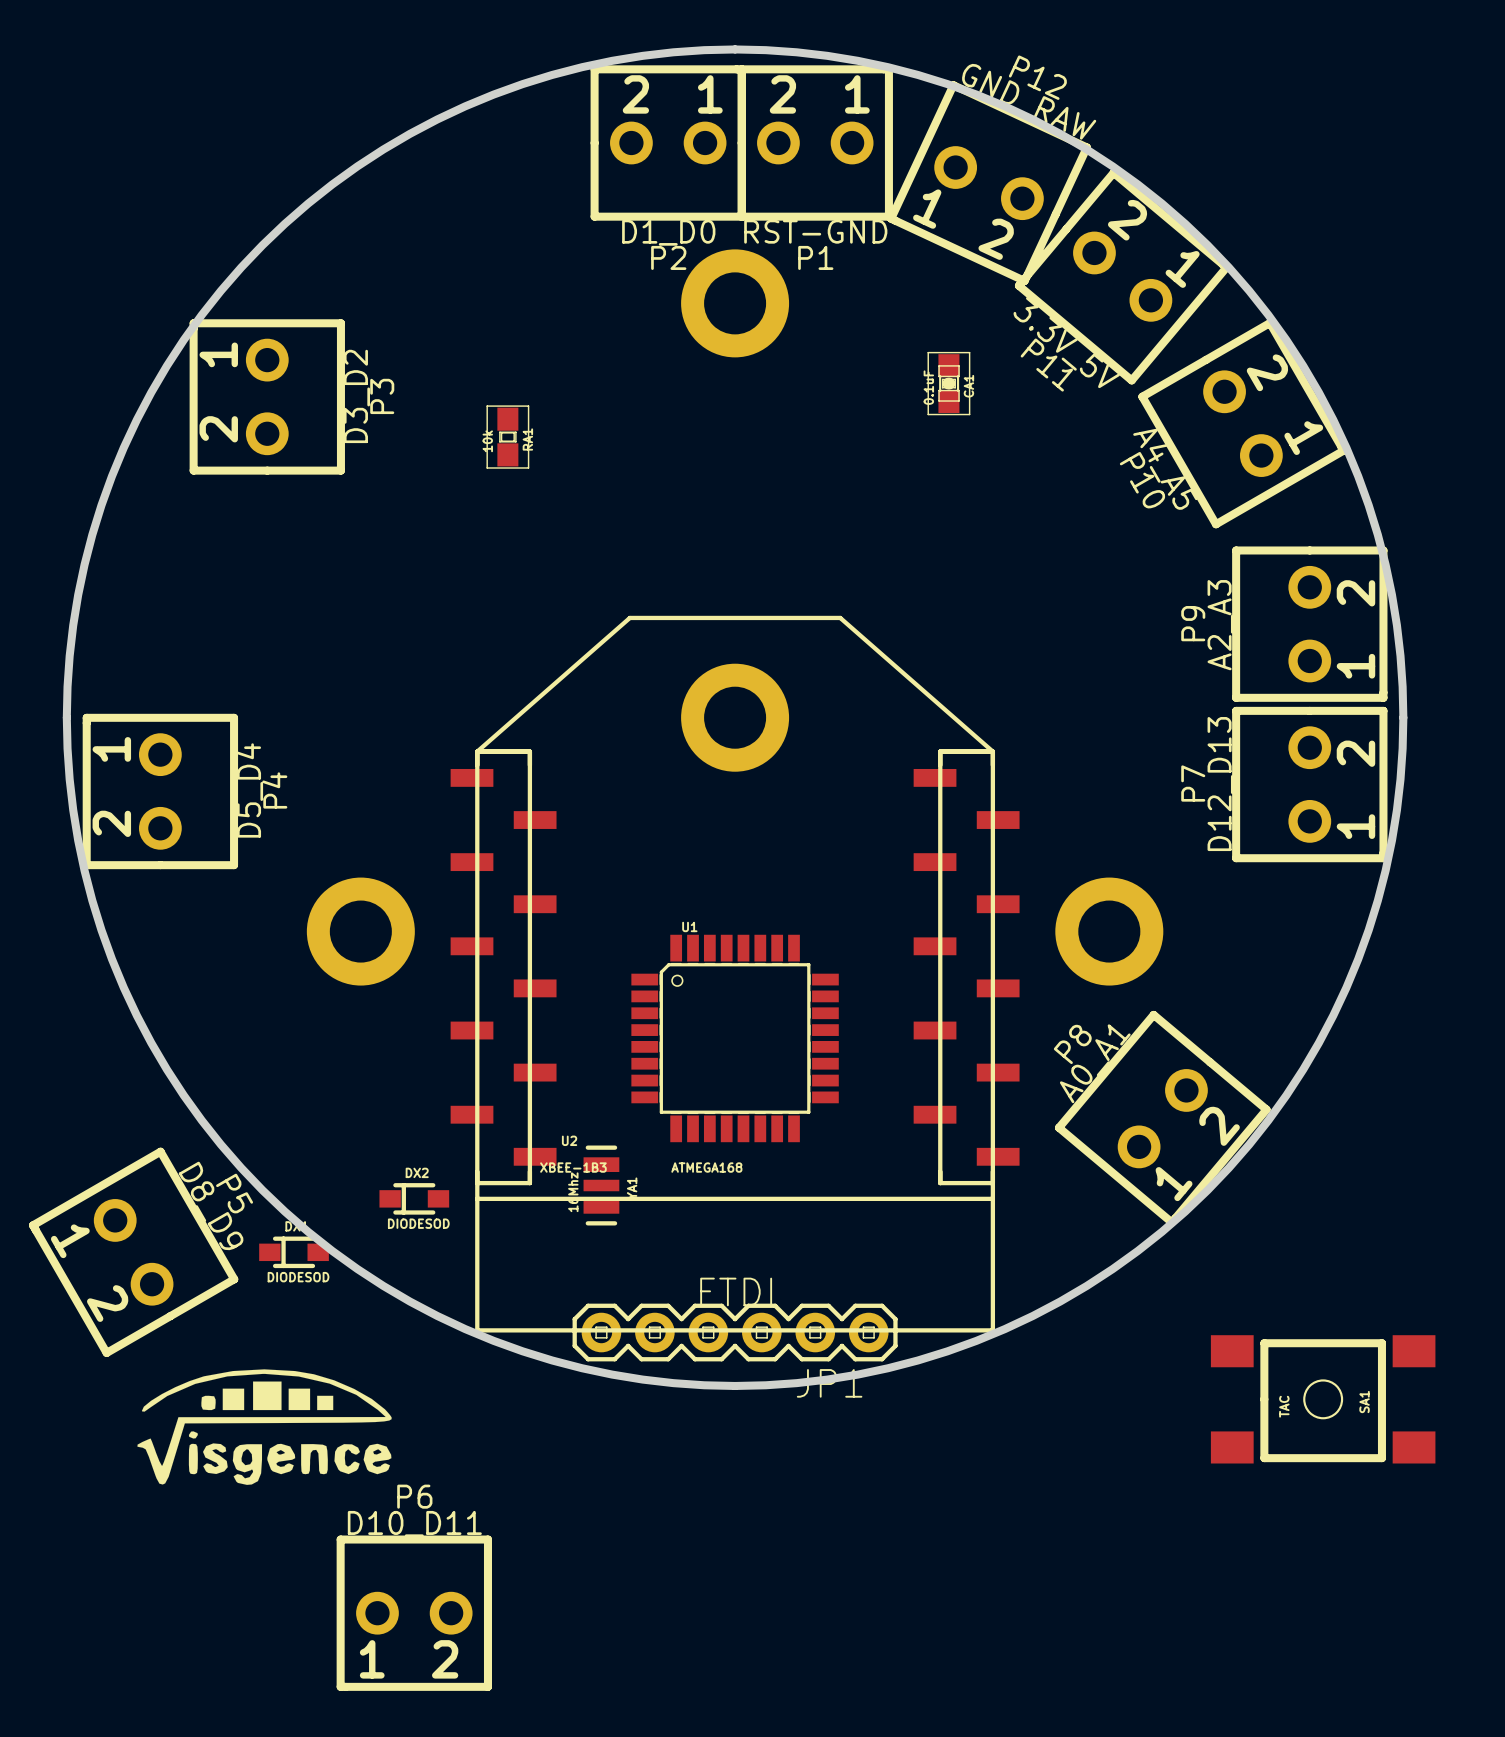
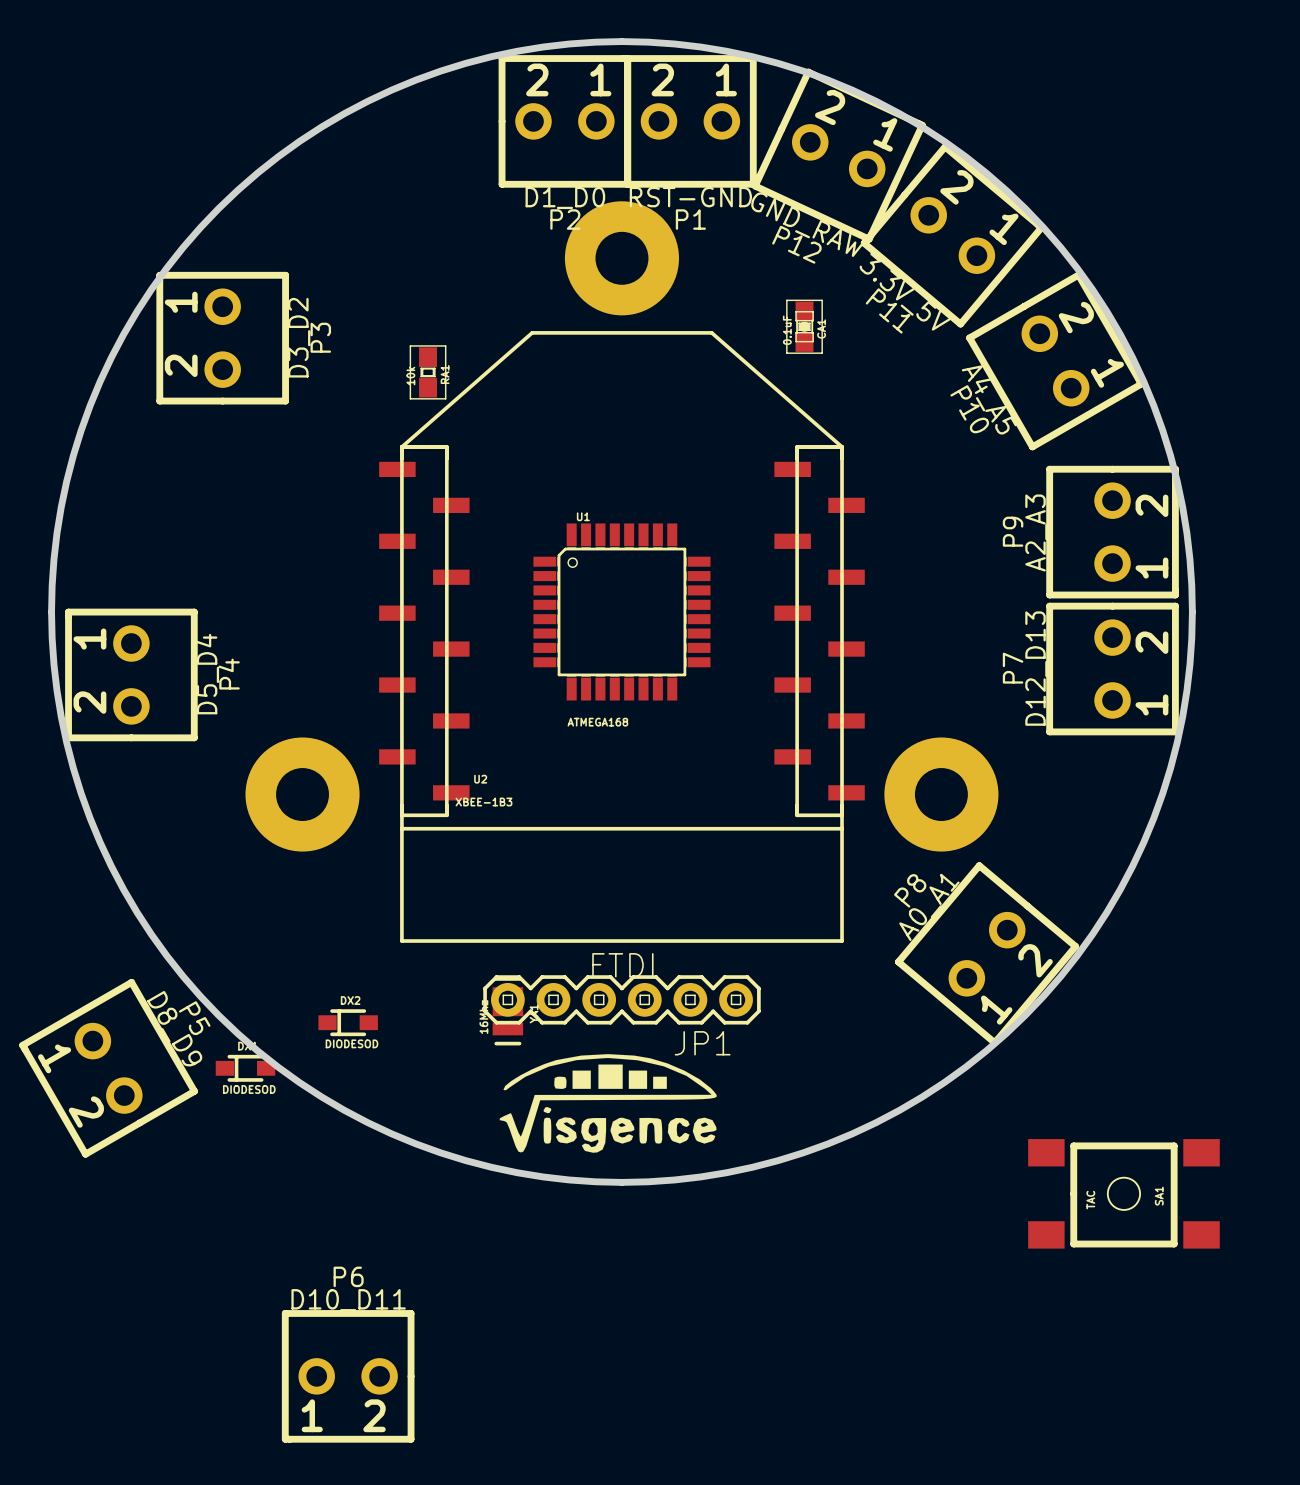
P12 rotation: 0° (989, 183) -> 180° (838, 155)
part footprint: [681, 249, 790, 358] -> [564, 201, 680, 316]
part: (735, 717) -> none
part footprint: [306, 877, 415, 986] -> [245, 737, 360, 852]
part footprint: [1055, 877, 1164, 986] -> [884, 737, 999, 852]
U2 position: (735, 974) -> (621, 636)
U1 position: (735, 1038) -> (621, 611)
JP1 position: (735, 1332) -> (621, 999)
drawing position: (264, 1427) -> (608, 1103)

